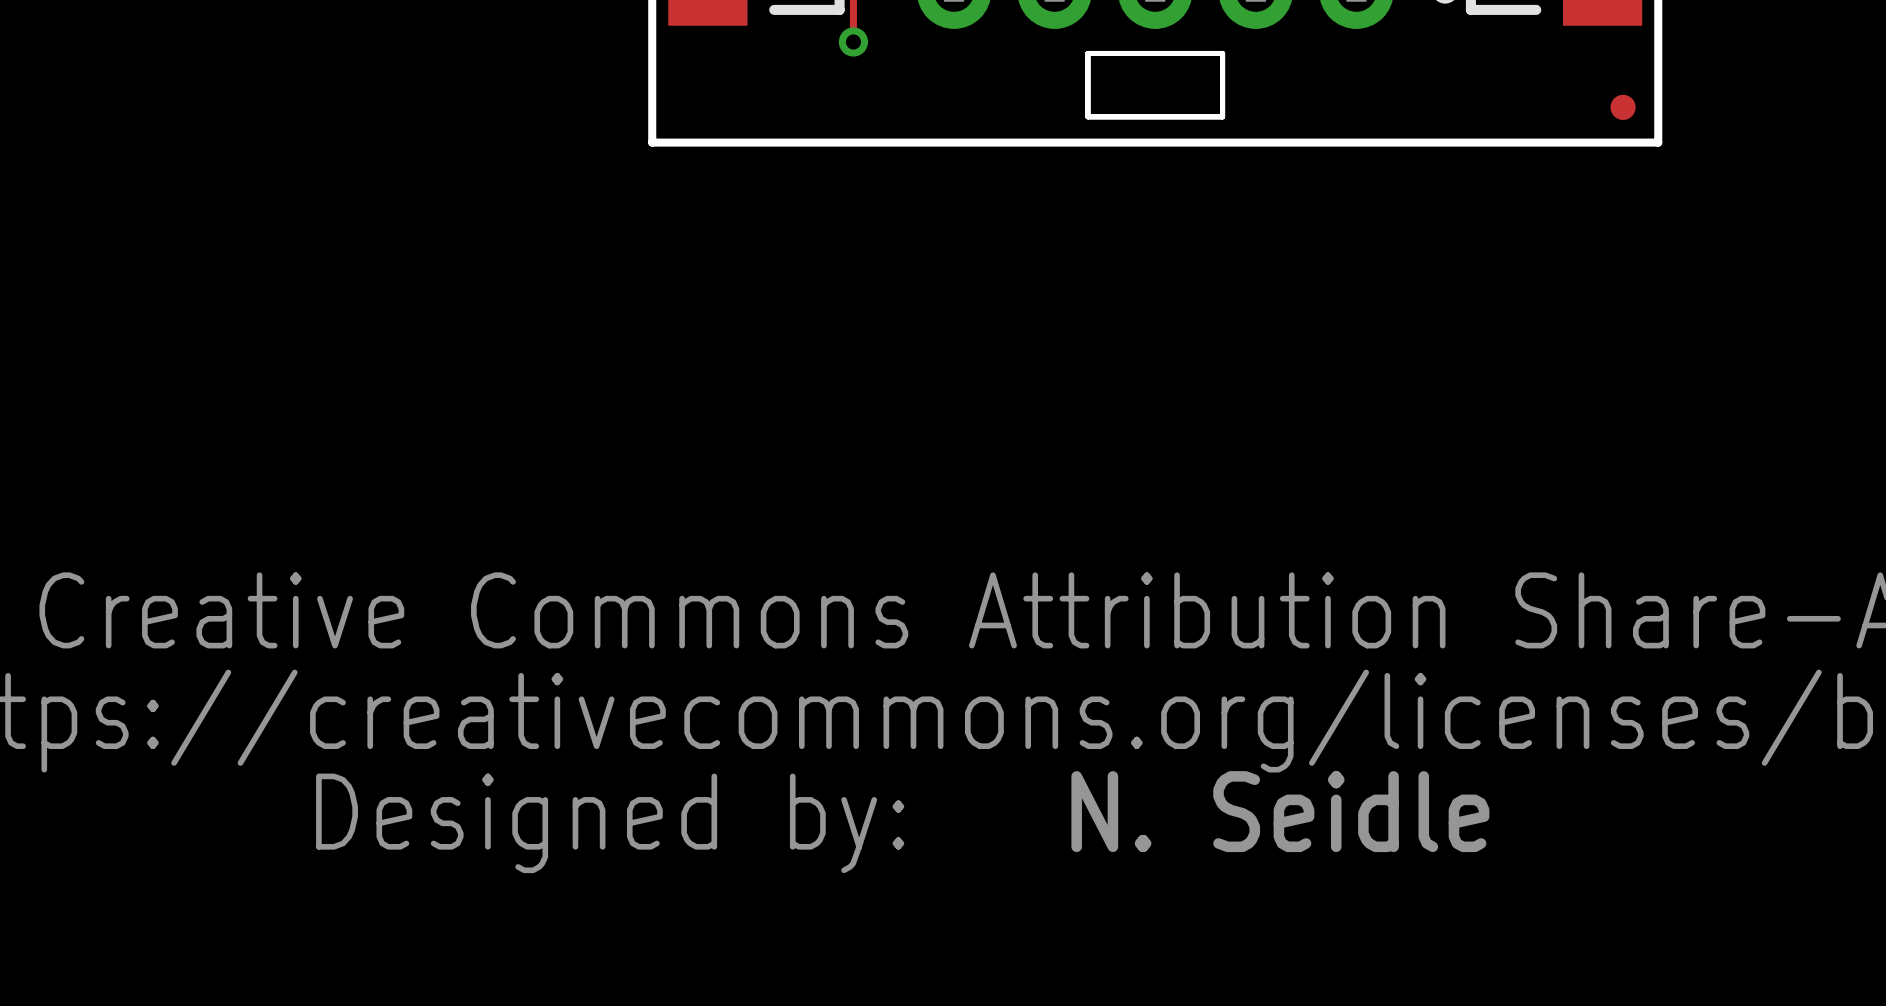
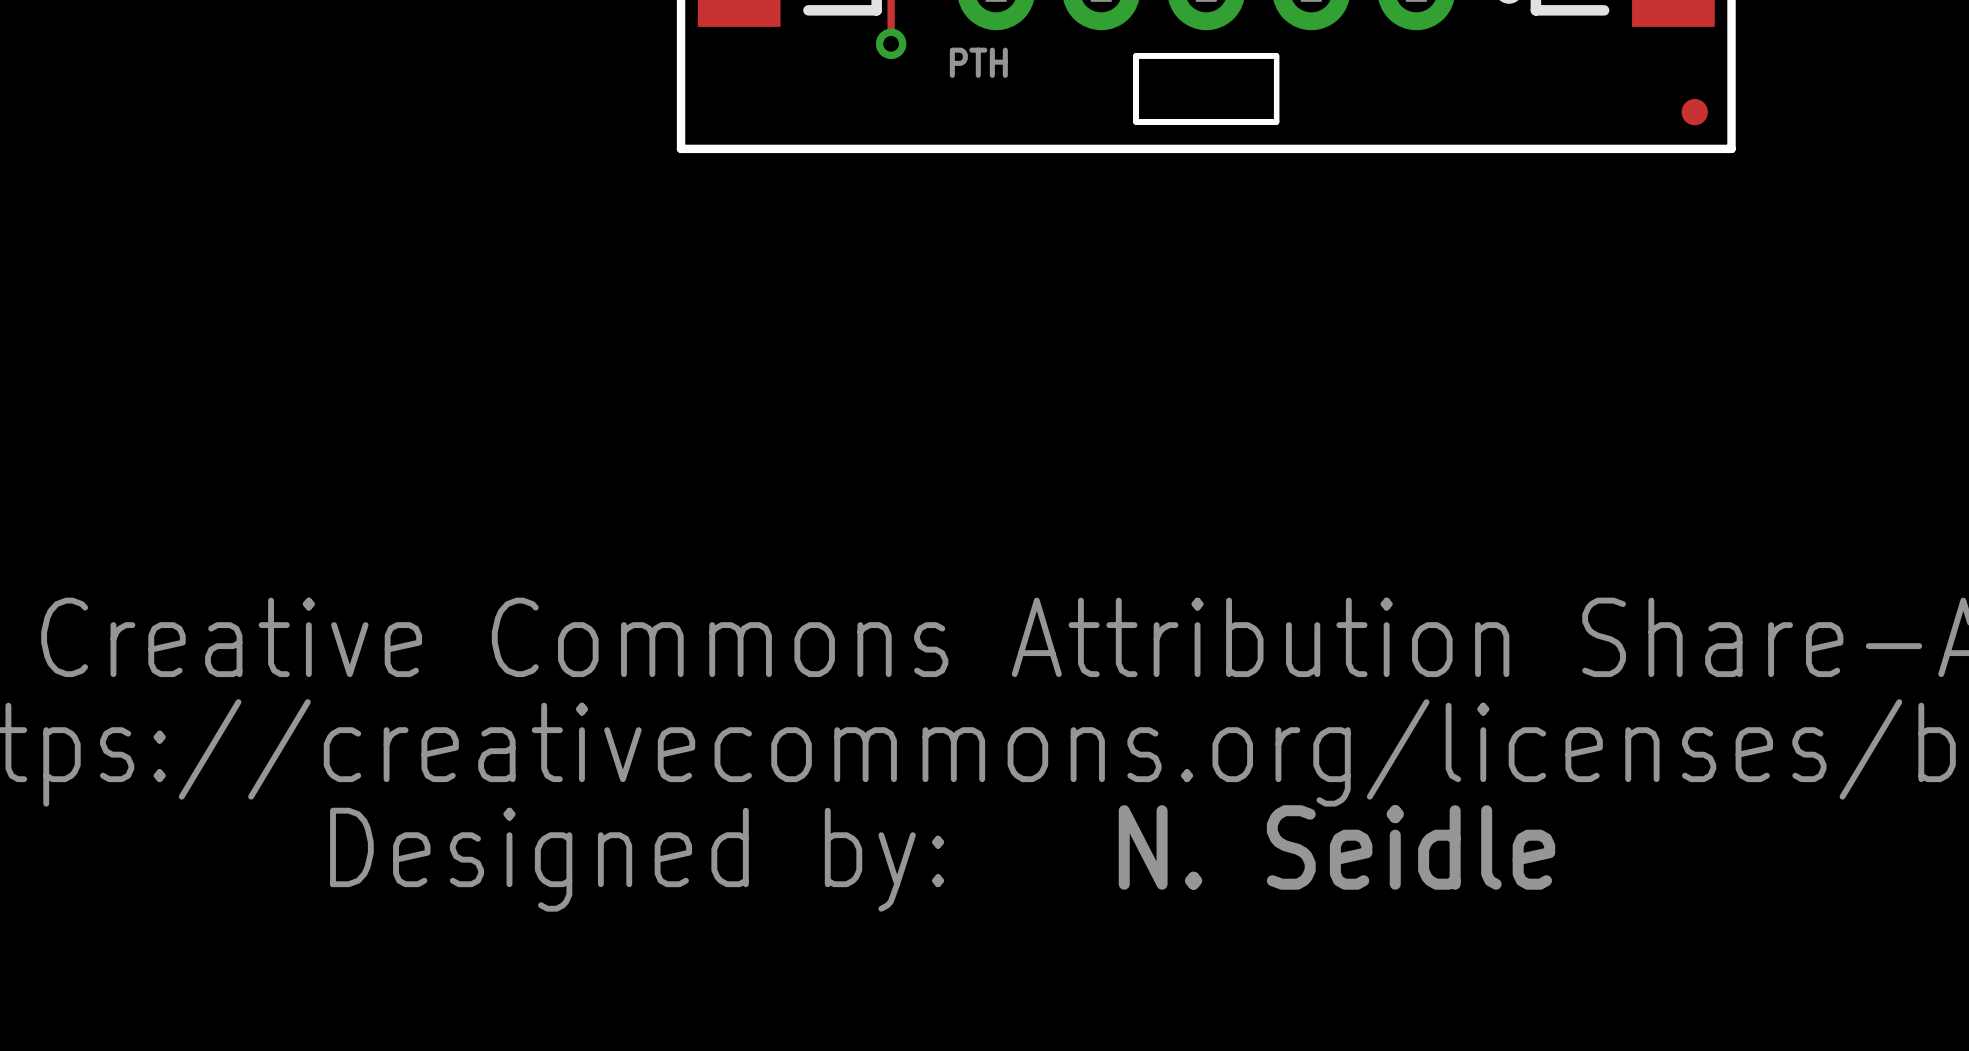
part value: none -> PTH (978, 62)

